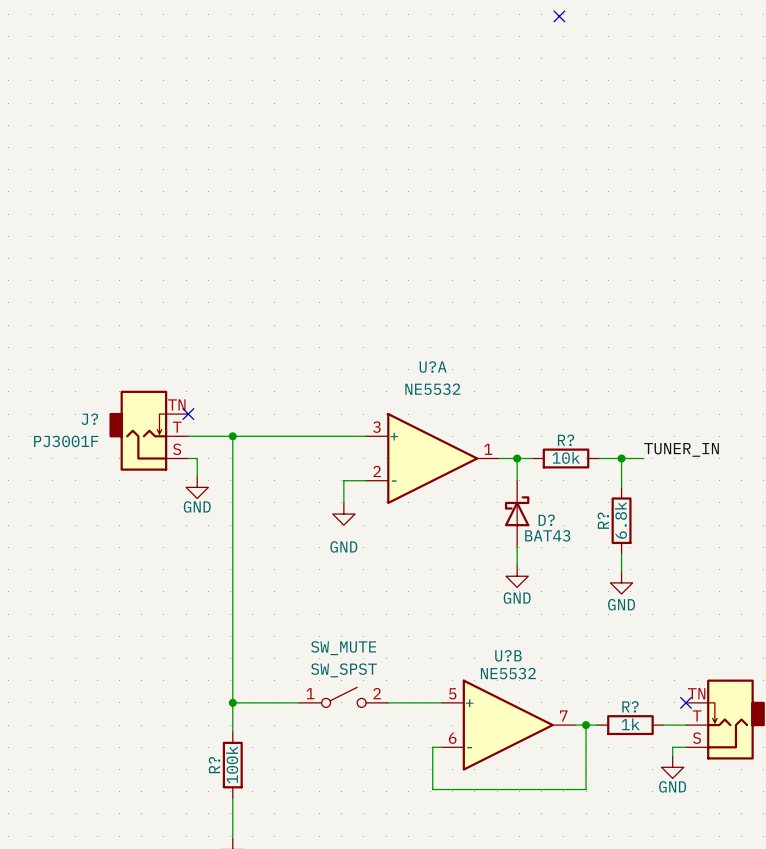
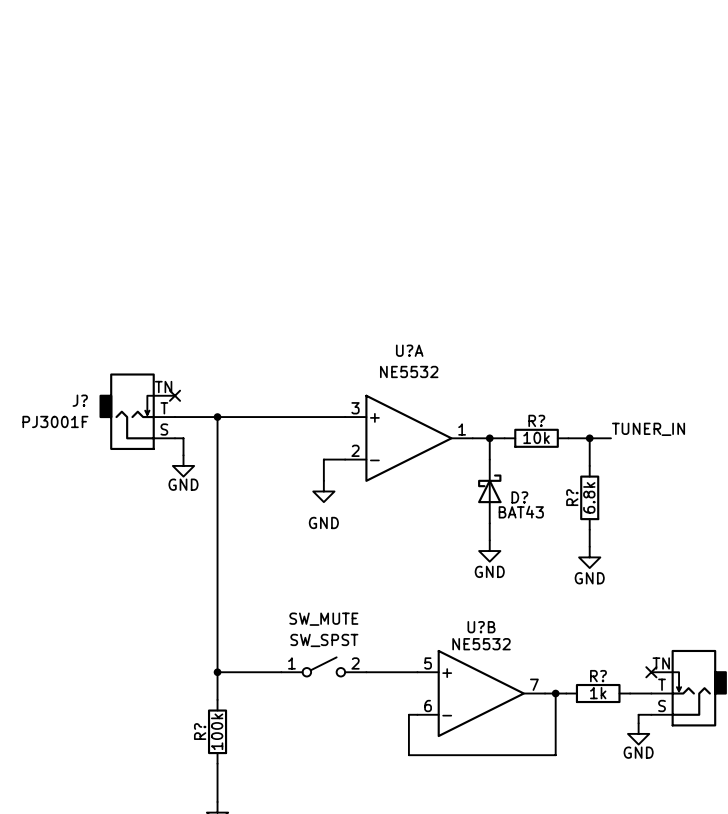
no-connect mark: (559, 16) -> none

